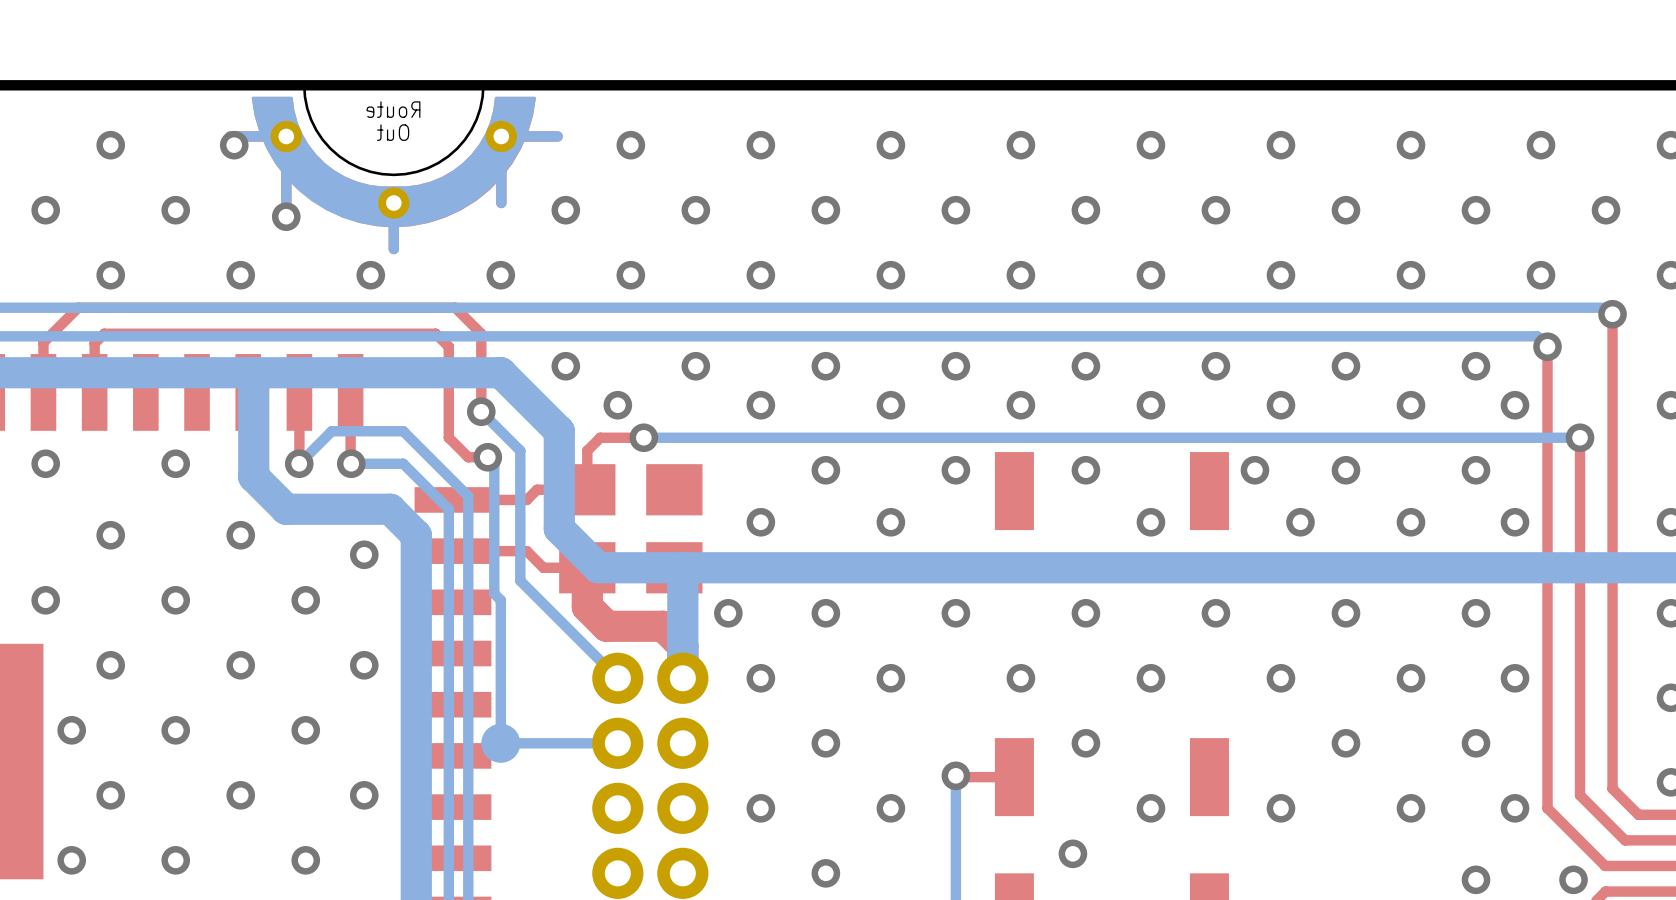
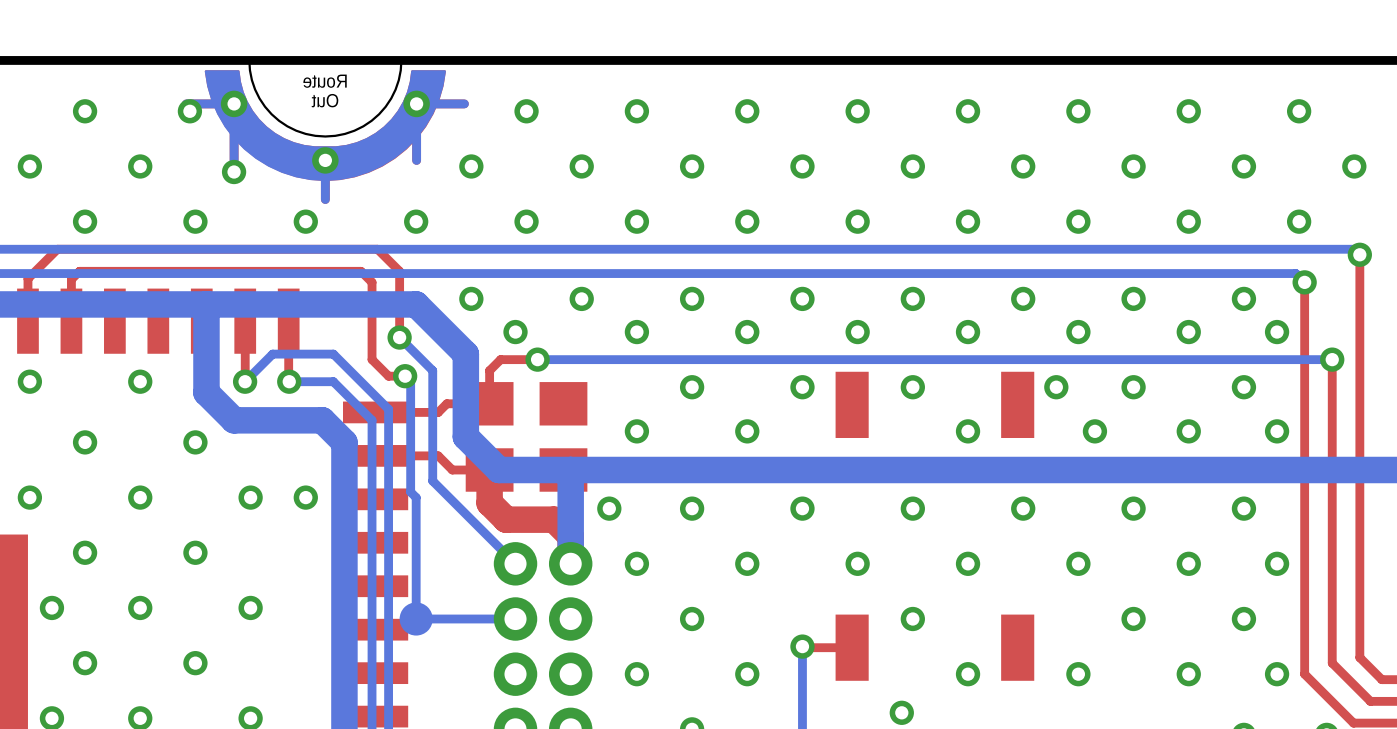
via: (364, 554) -> none
via: none -> (305, 497)
via: (364, 665) -> none
via: (364, 795) -> none

